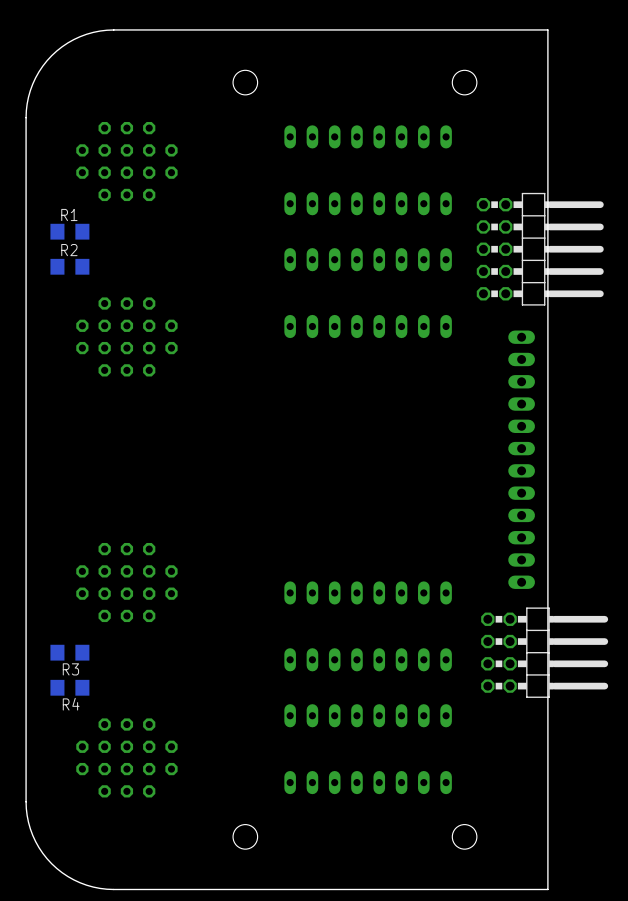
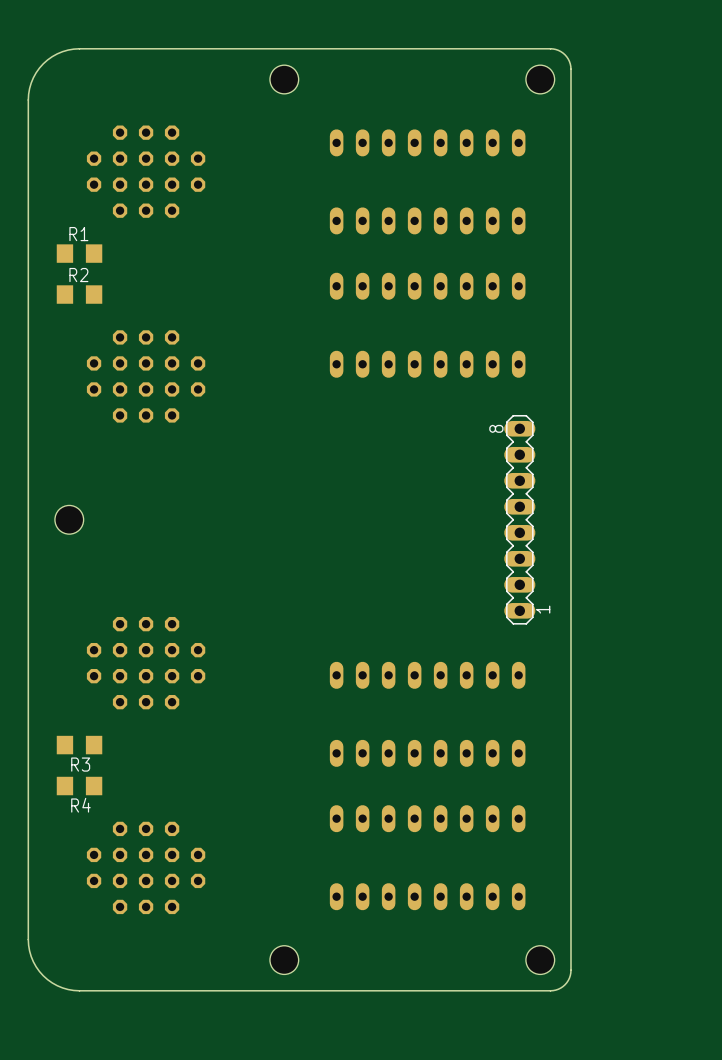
board edge: (26, 117) (30, 90) (35, 77) (47, 60) (62, 46) (73, 39) (100, 31) (547, 29) (547, 889) (100, 888) (73, 879) (62, 872) (47, 858) (35, 841) (30, 828) (26, 801) -> (28, 120) (28, 94) (36, 72) (52, 56) (73, 49) (550, 48) (562, 53) (568, 59) (570, 66) (570, 970) (568, 980) (560, 988) (550, 990) (73, 990) (52, 982) (36, 966) (28, 945) (28, 919)
part: (540, 249) -> none
hole: none -> (69, 519)
part: none -> (519, 519)
part: (521, 459) -> none
part: (544, 652) -> none

